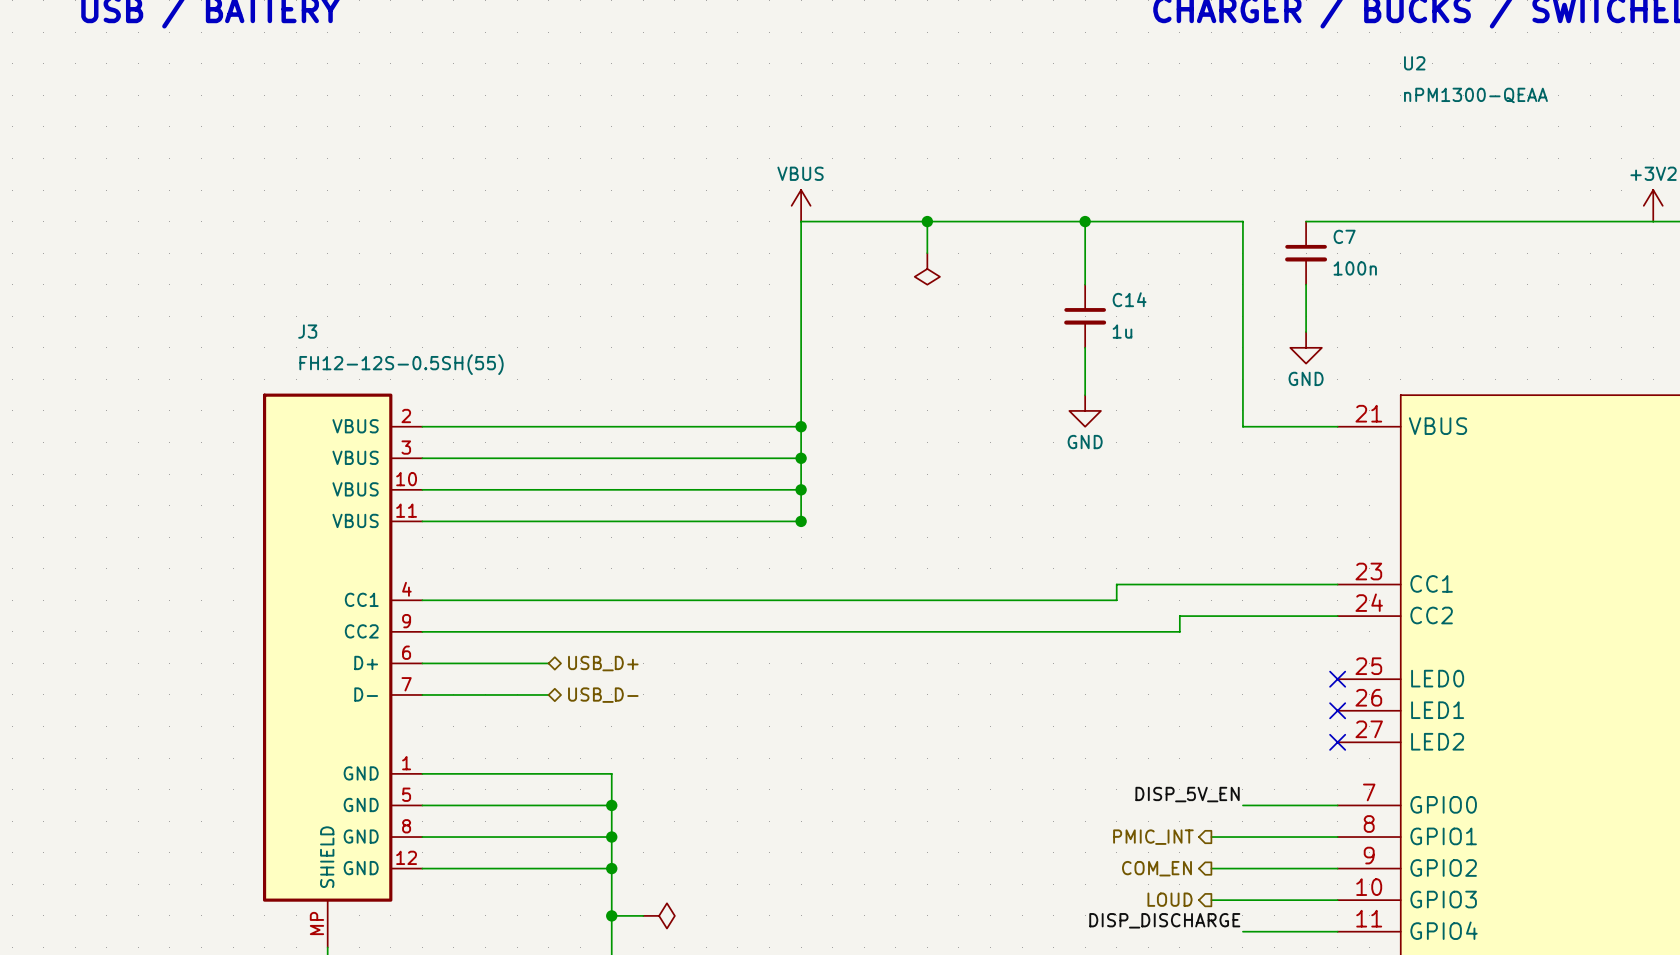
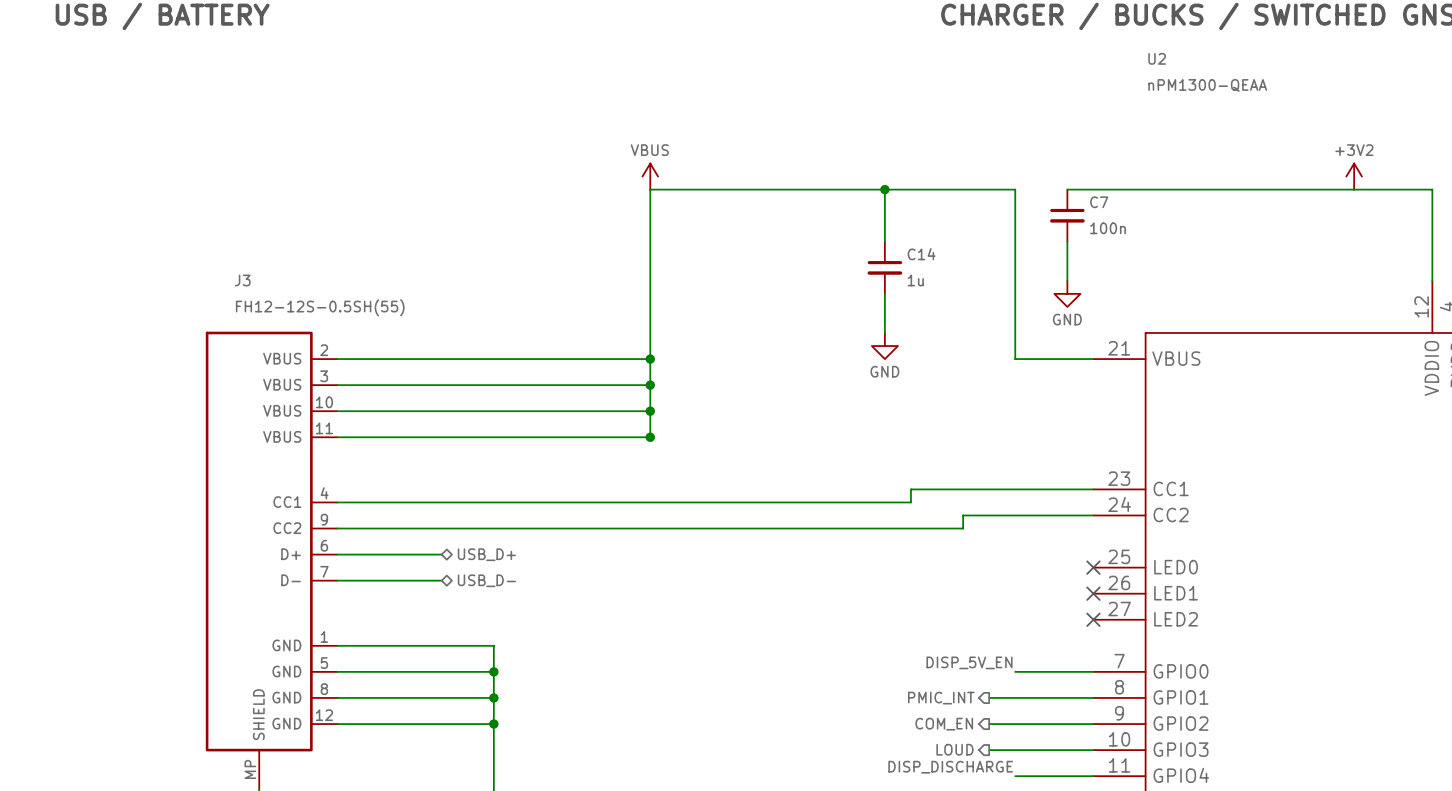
wire: (927, 221) (927, 253) -> none
junction: (927, 221) -> none
power symbol: (927, 268) -> none
wire: (611, 915) (643, 915) -> none
junction: (611, 915) -> none
power symbol: (659, 915) -> none

